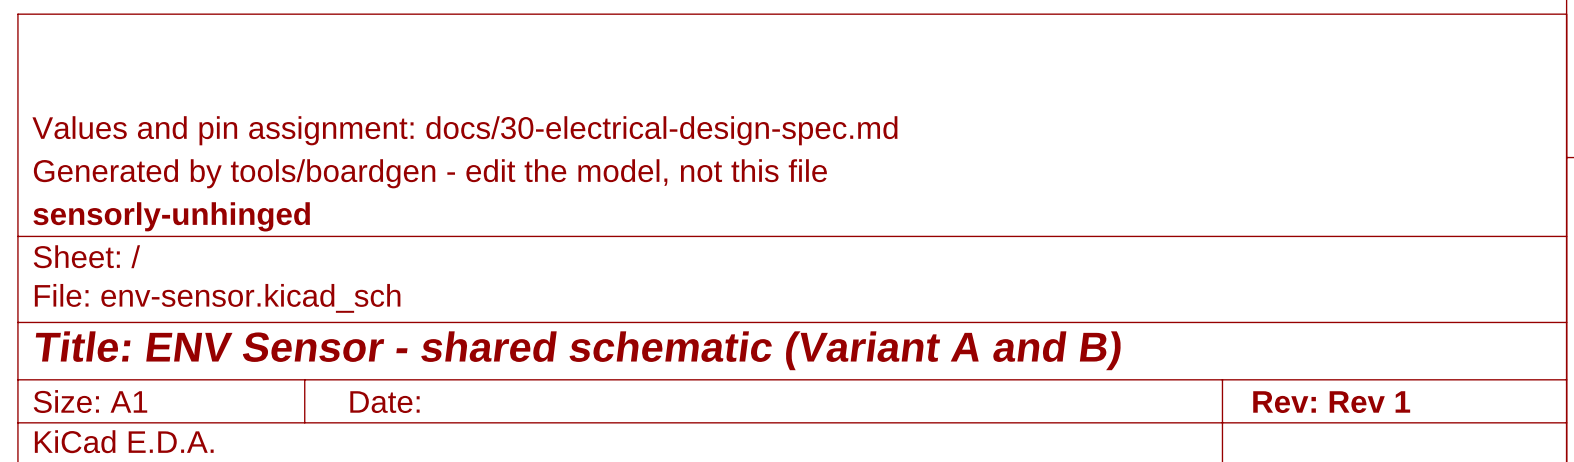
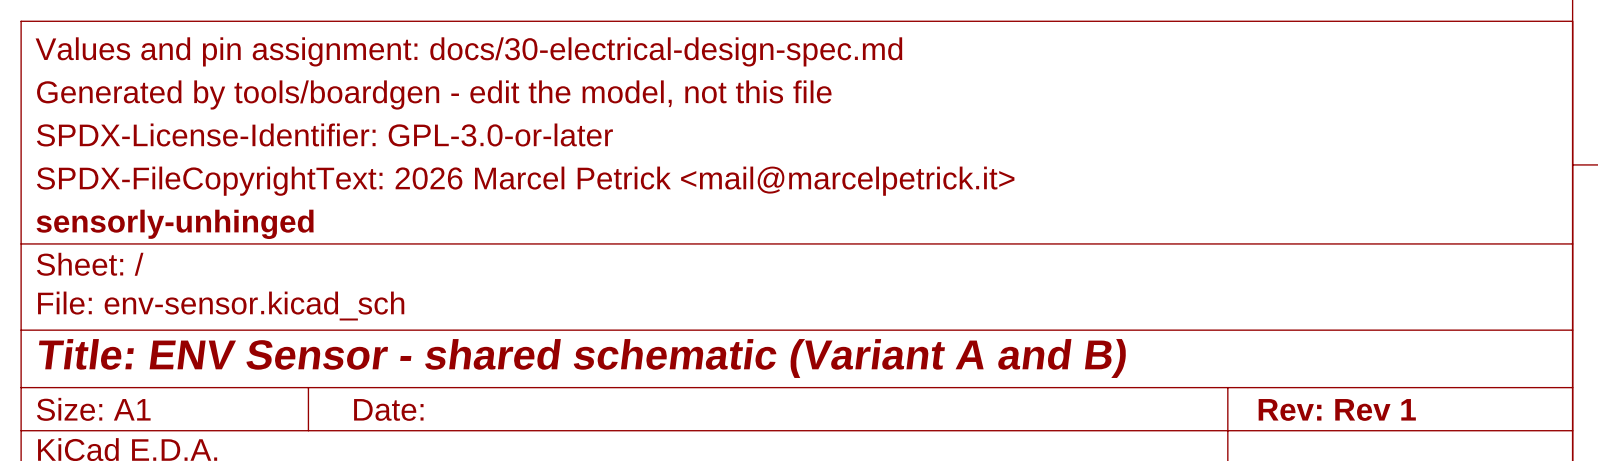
title block: none -> Values and pin assignment: docs/30-electrical-design-spec.md (468, 51)
title block: none -> Generated by tools/boardgen - edit the model, not this file (434, 94)
title block: Values and pin assignment: docs/30-electrical-design-spec.md (464, 130) -> SPDX-License-Identifier: GPL-3.0-or-later (324, 134)
title block: Generated by tools/boardgen - edit the model, not this file (430, 173) -> SPDX-FileCopyrightText: 2026 Marcel Petrick <mail@marcelpetrick.it> (525, 181)

